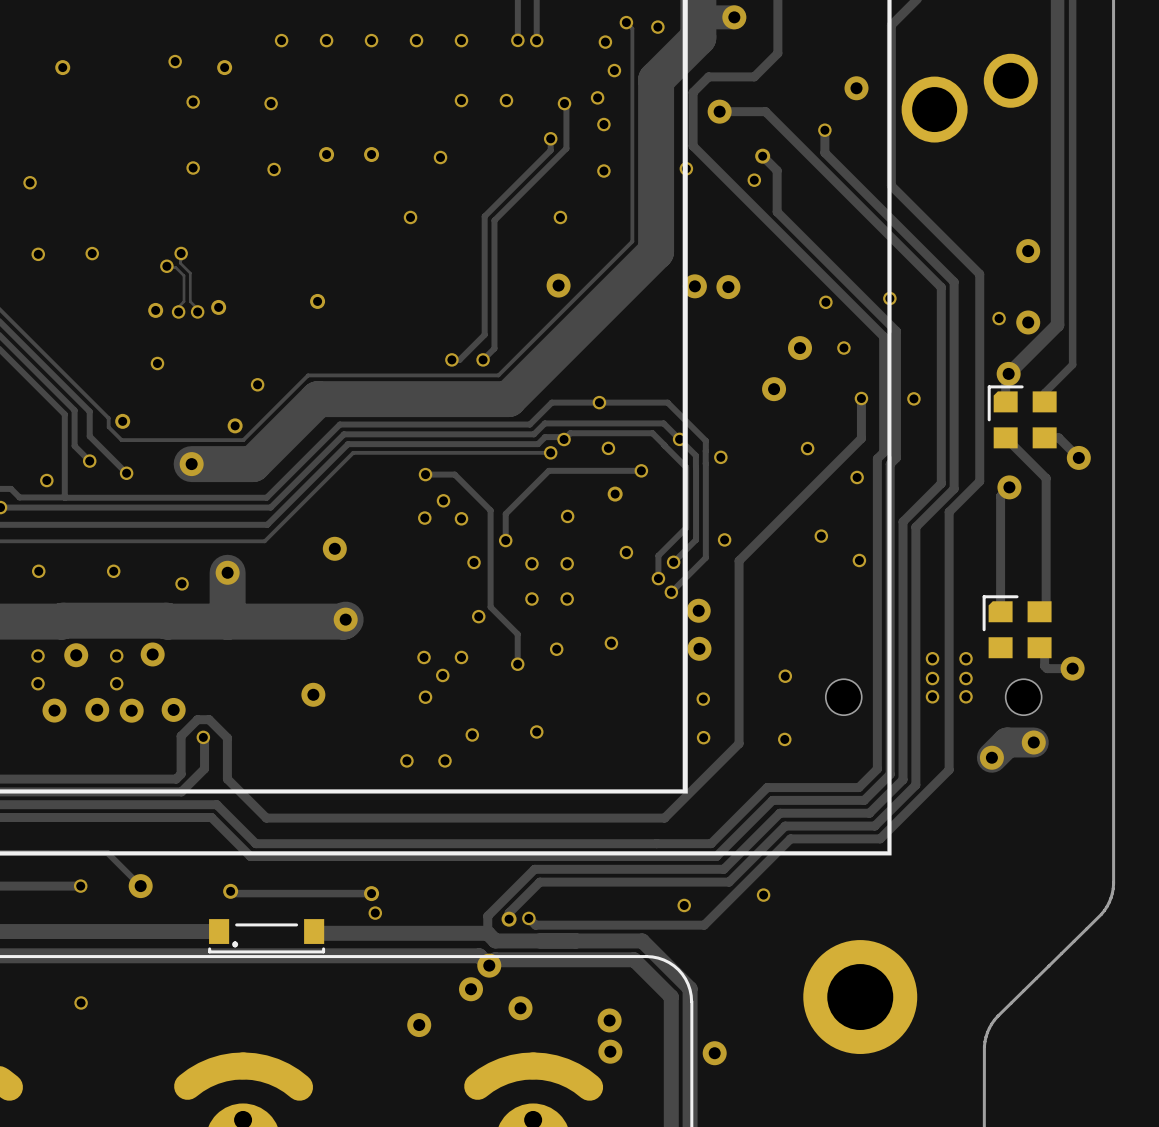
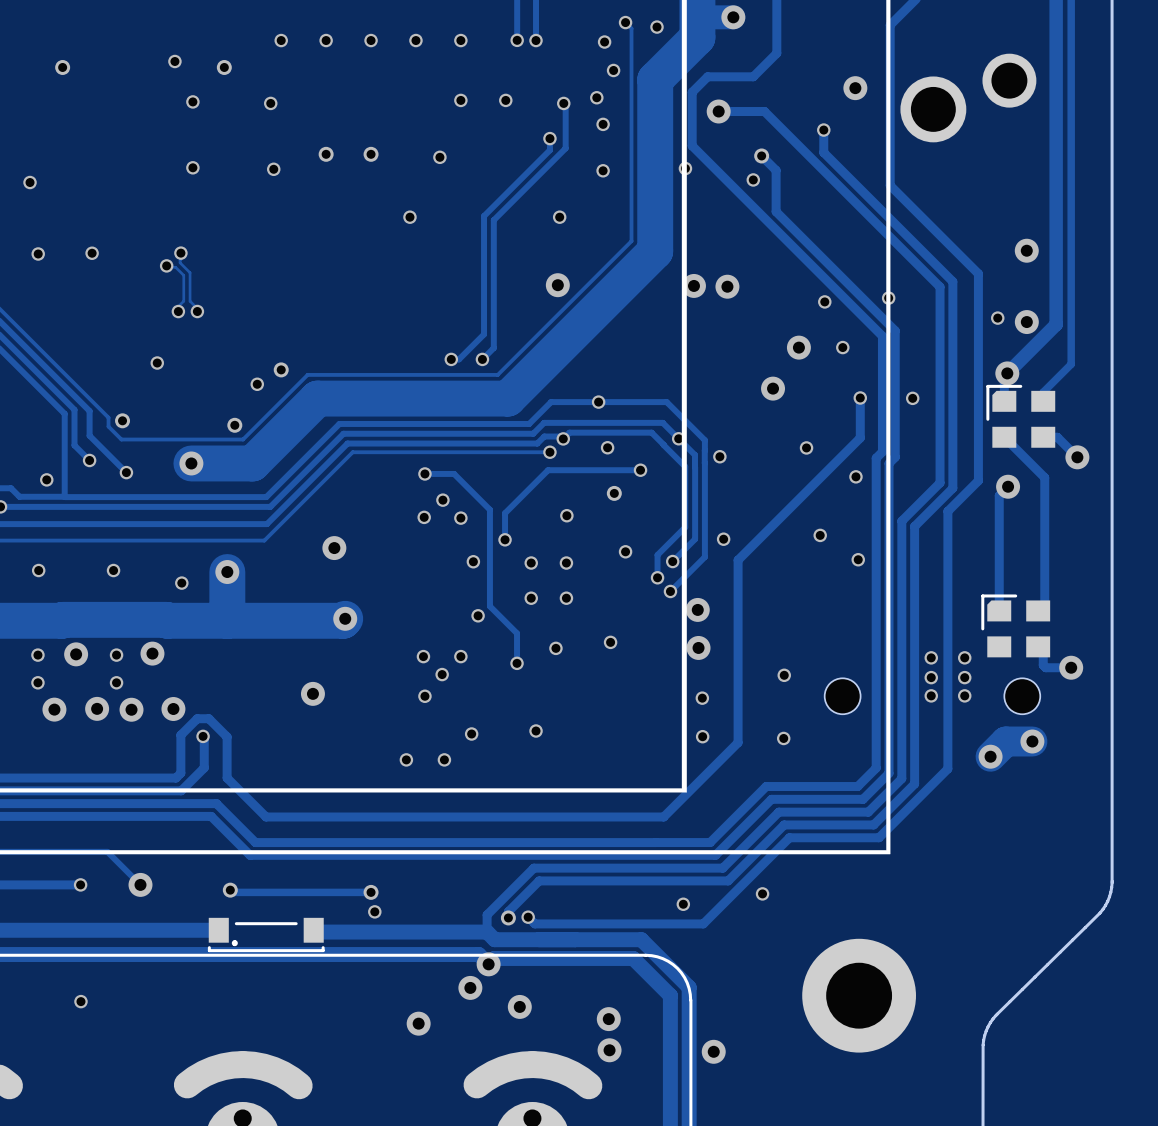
via: (317, 301) -> none
via: (218, 307) -> none
via: (155, 310) -> none
via: none -> (281, 369)

